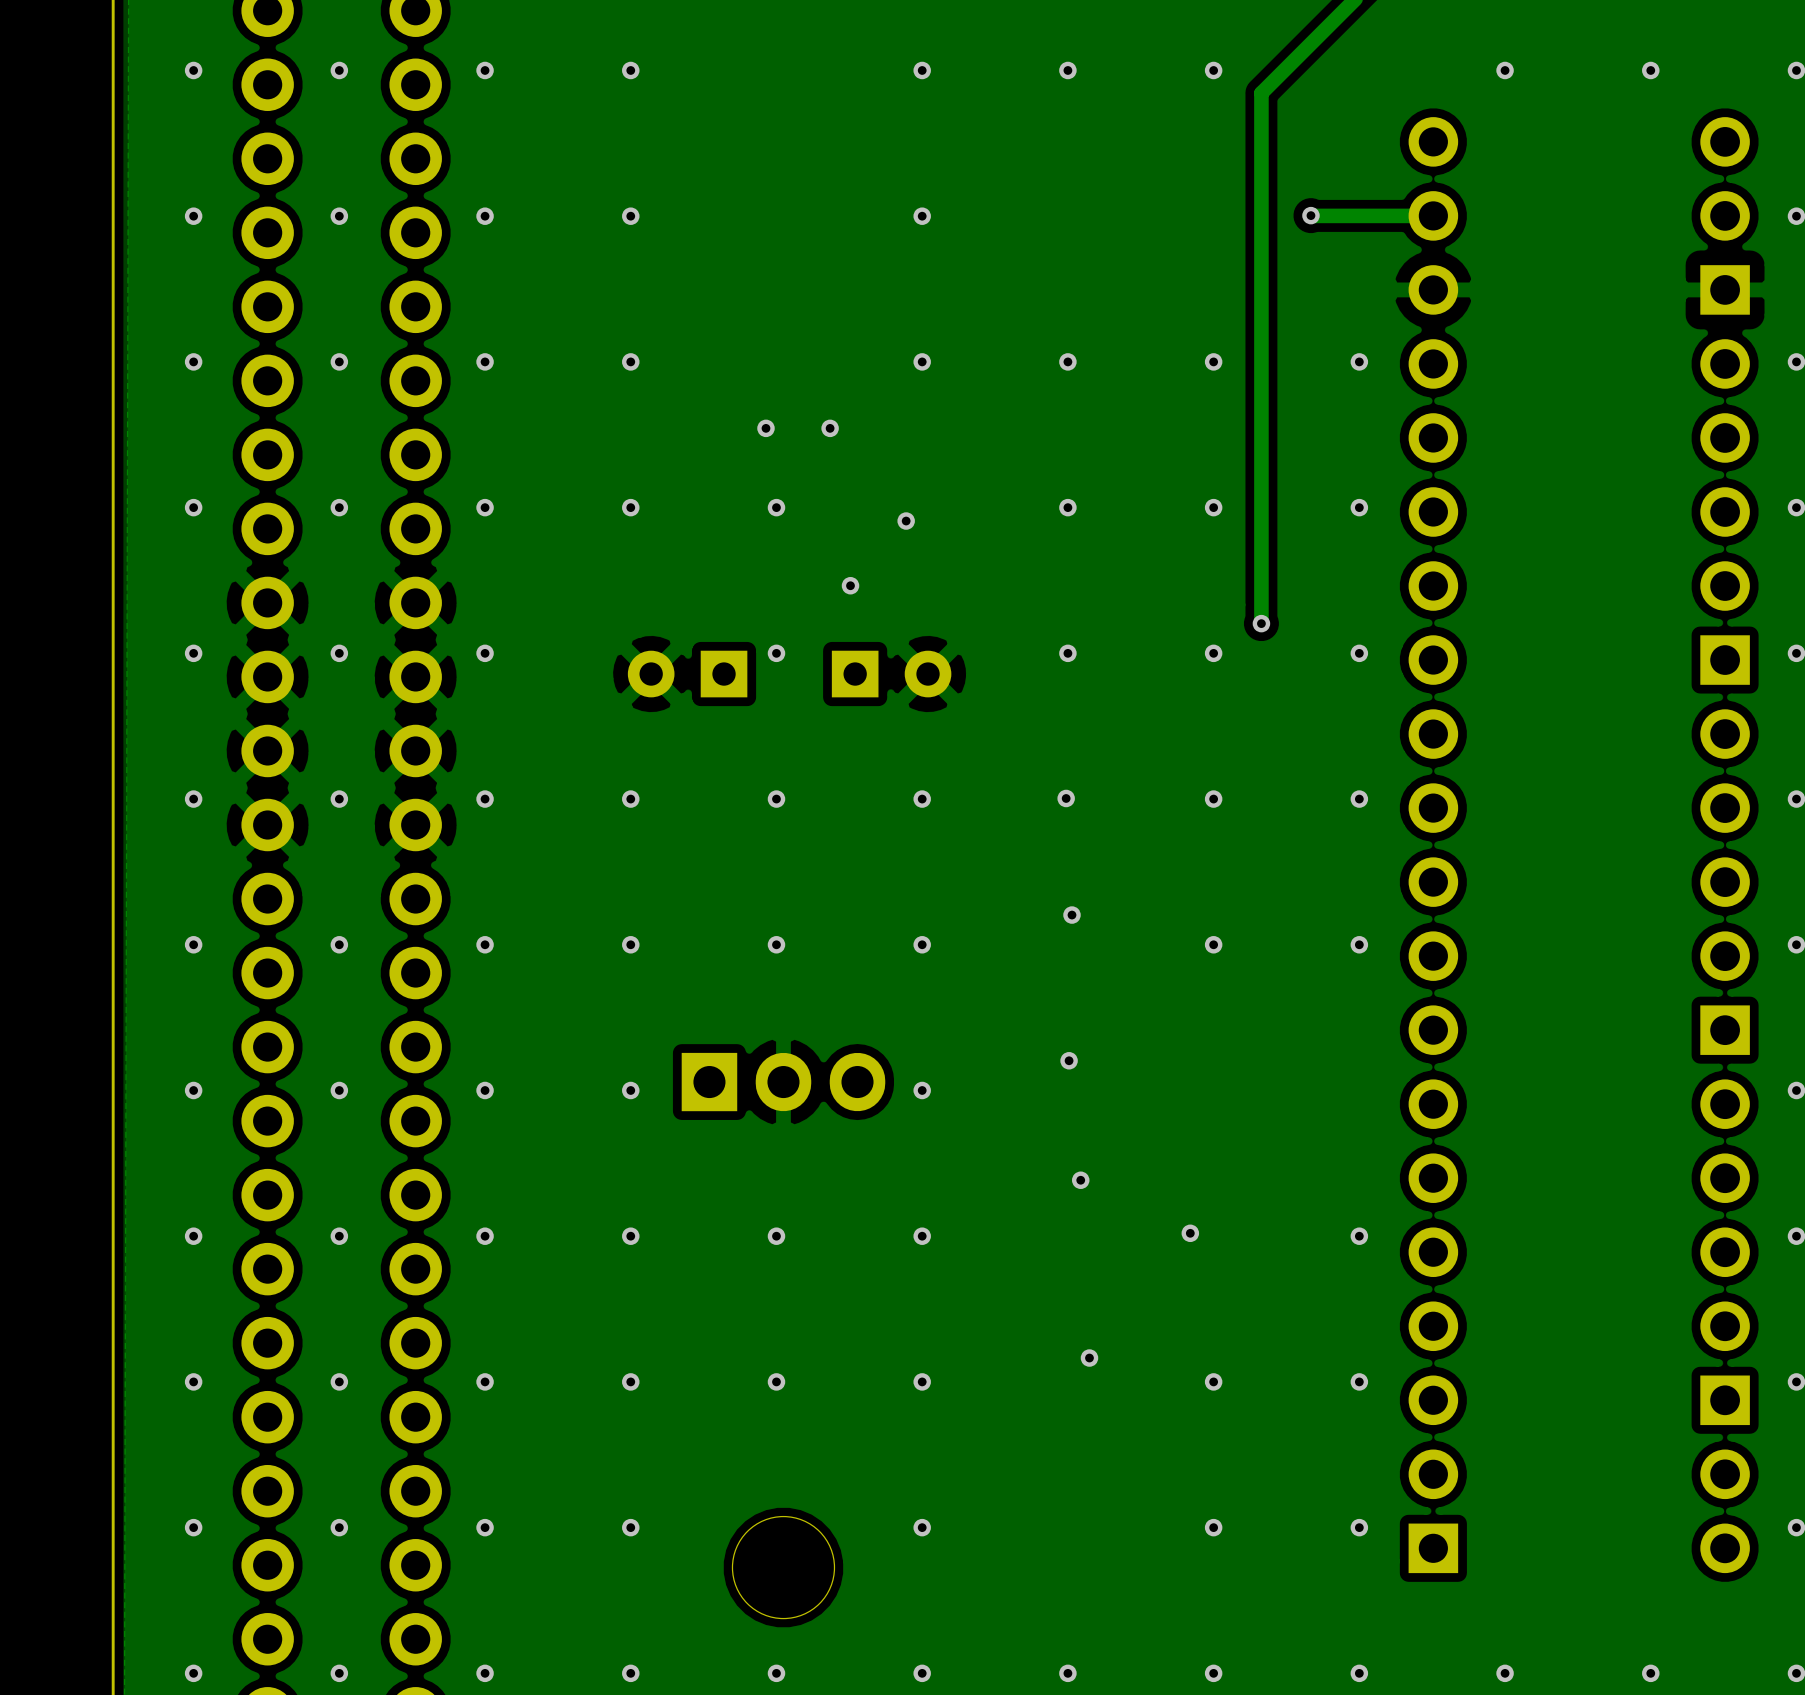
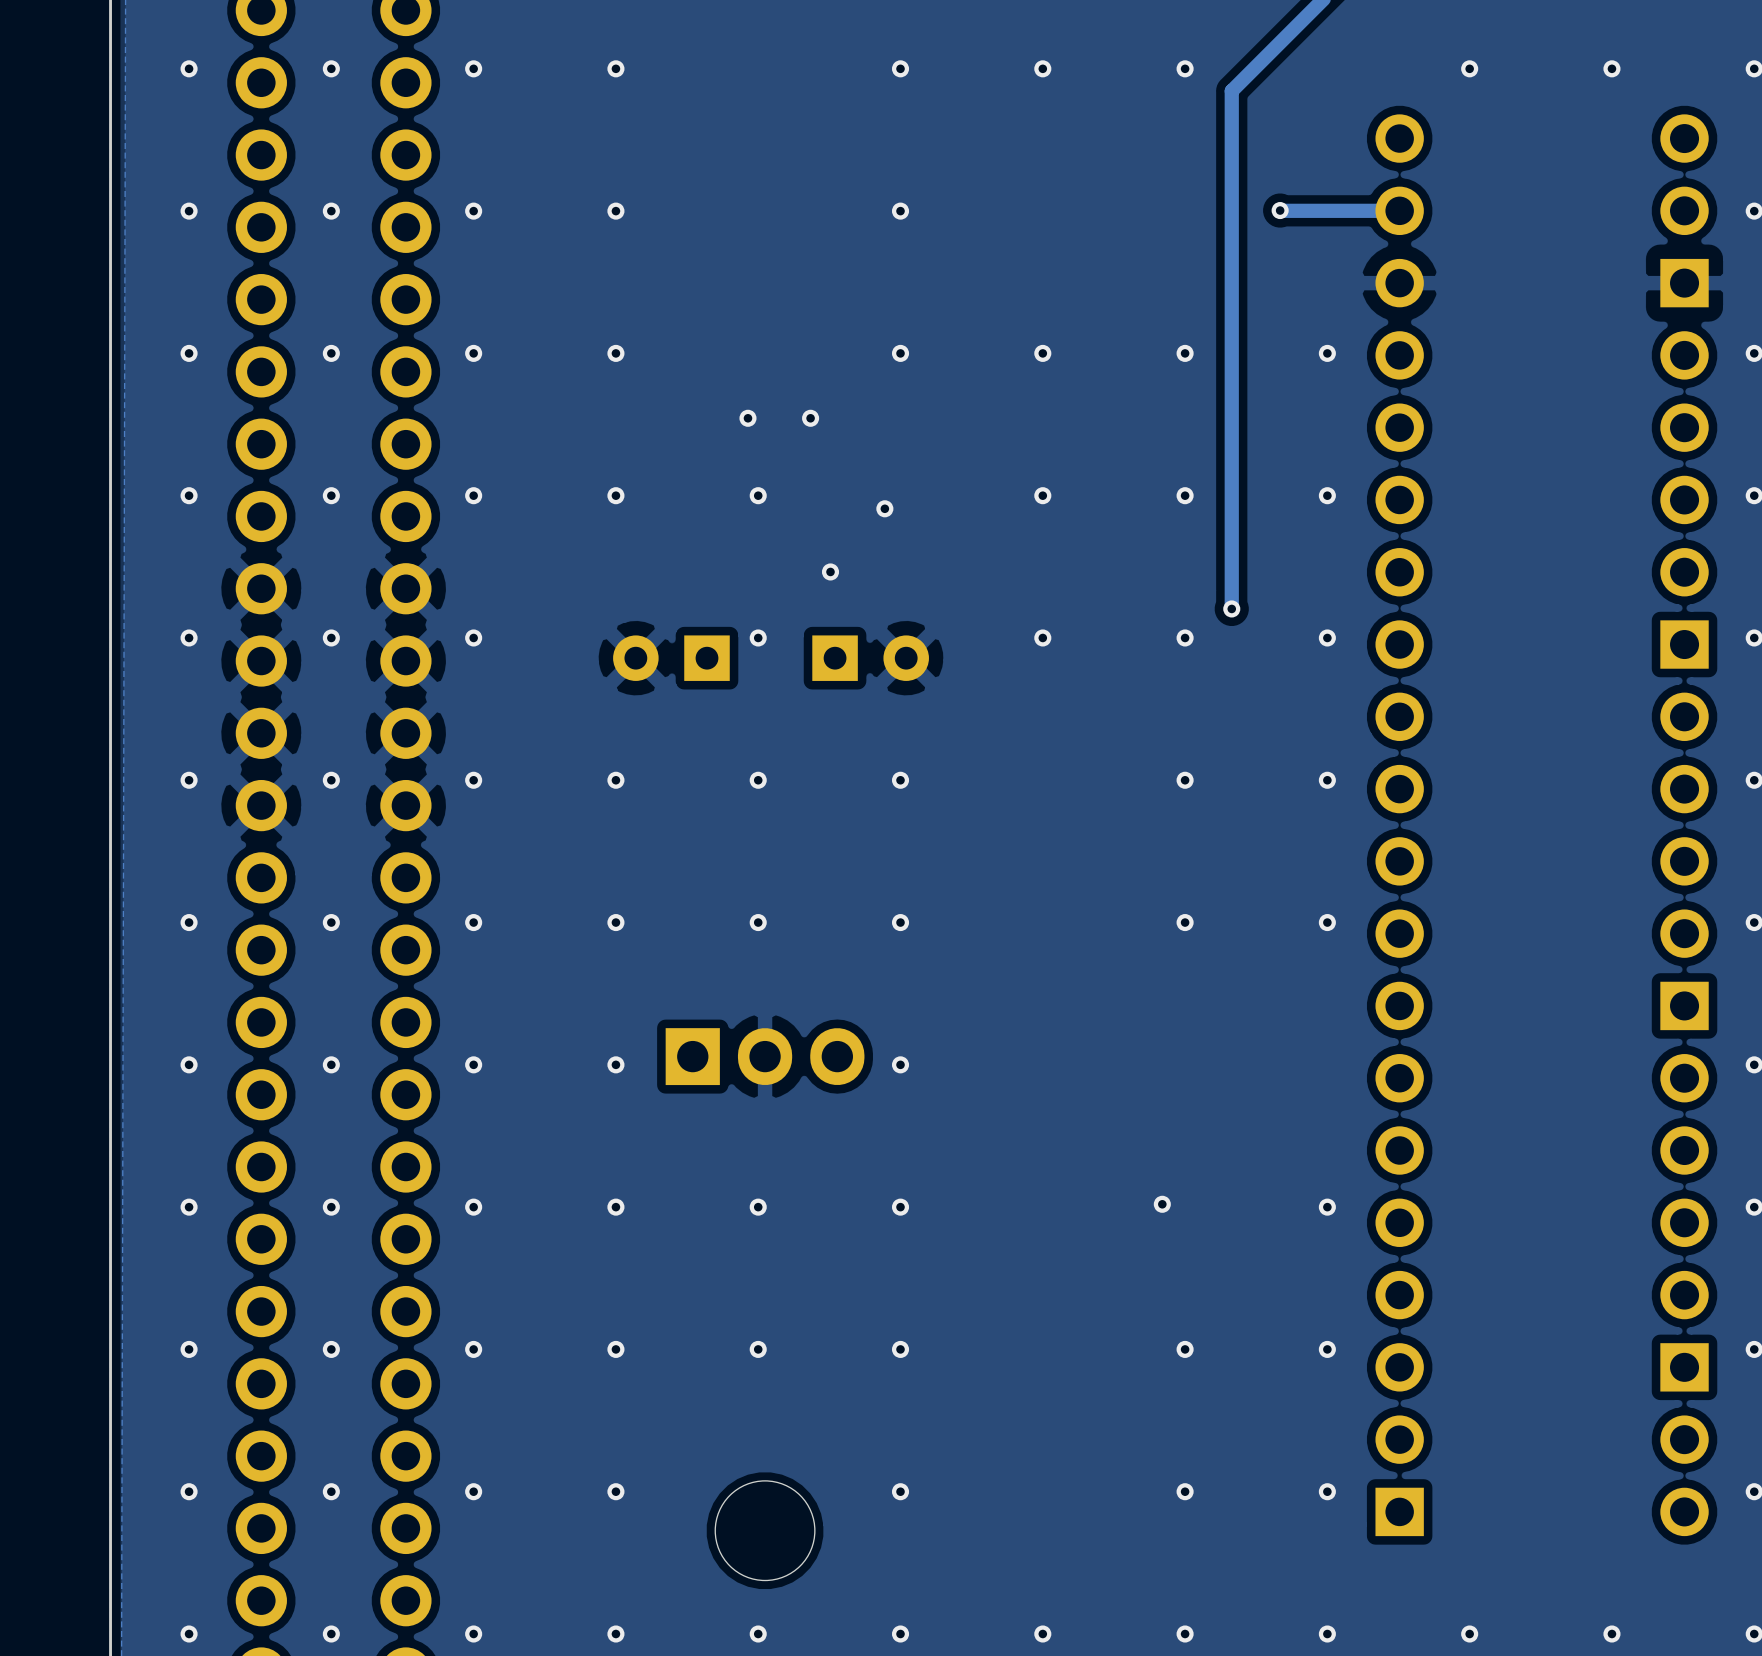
via: (1066, 798) -> none
via: (1071, 915) -> none
via: (1069, 1060) -> none
via: (1080, 1180) -> none
via: (1089, 1358) -> none

